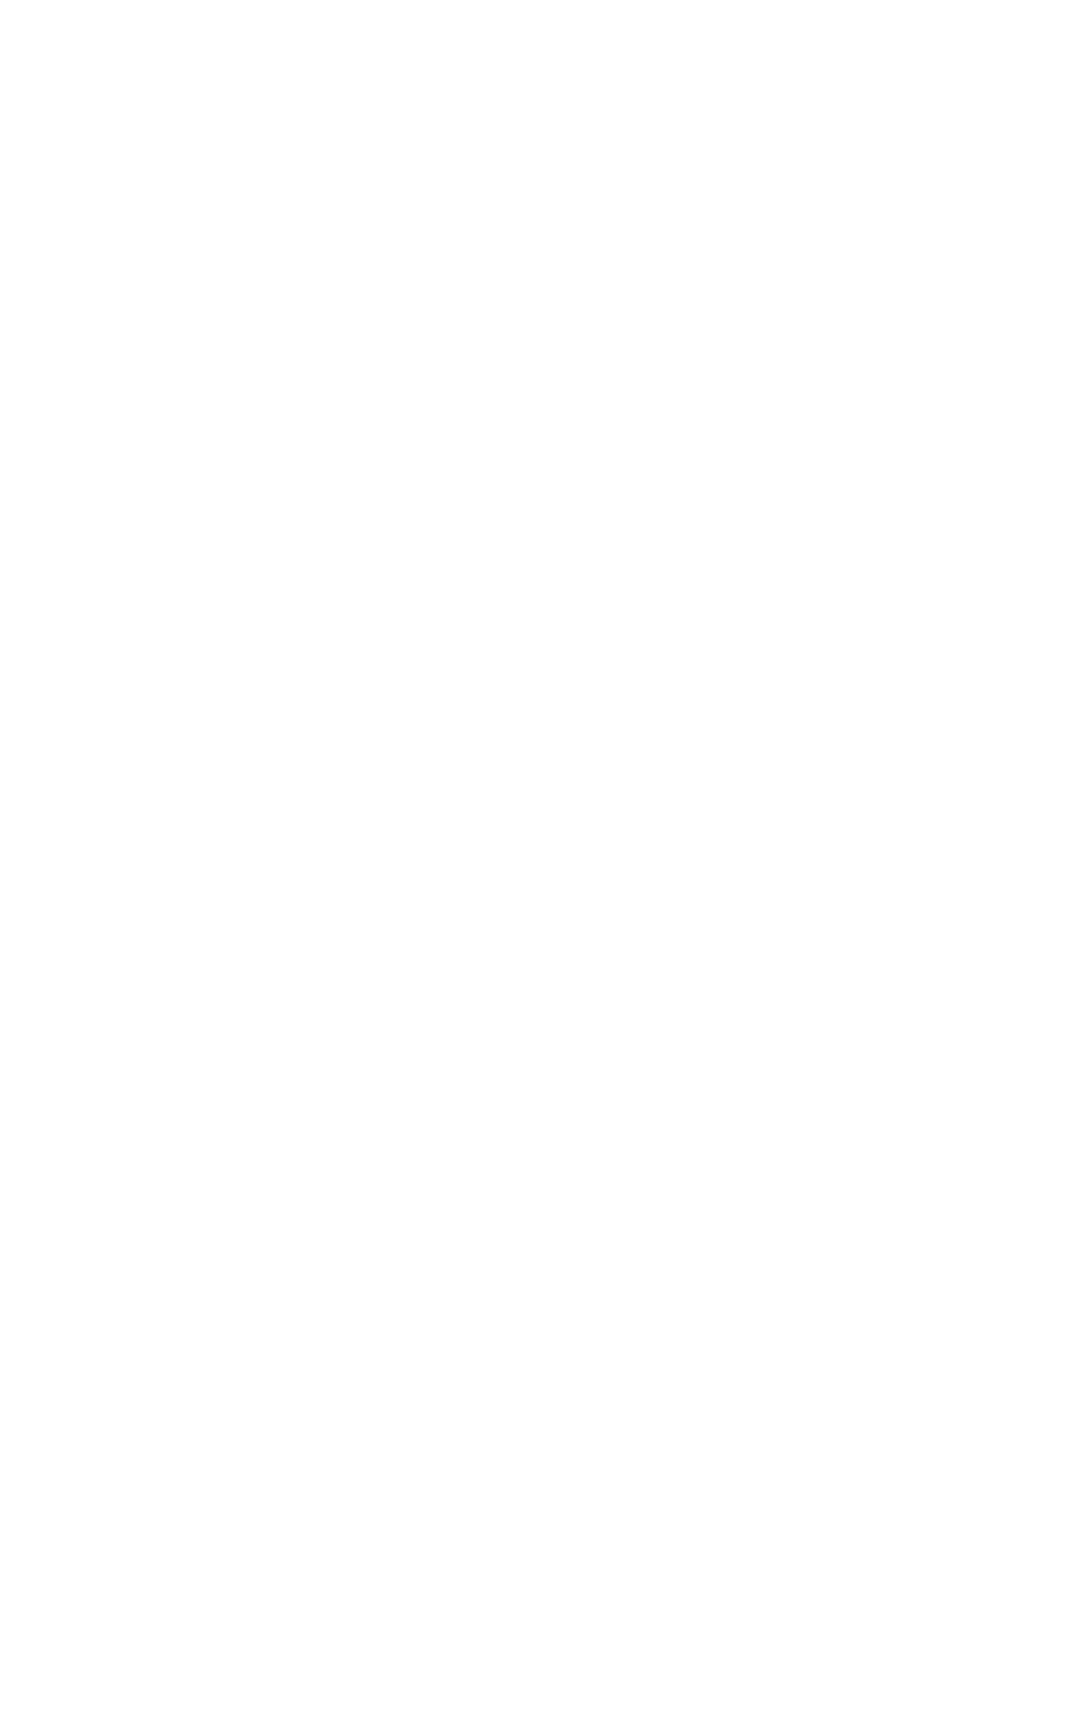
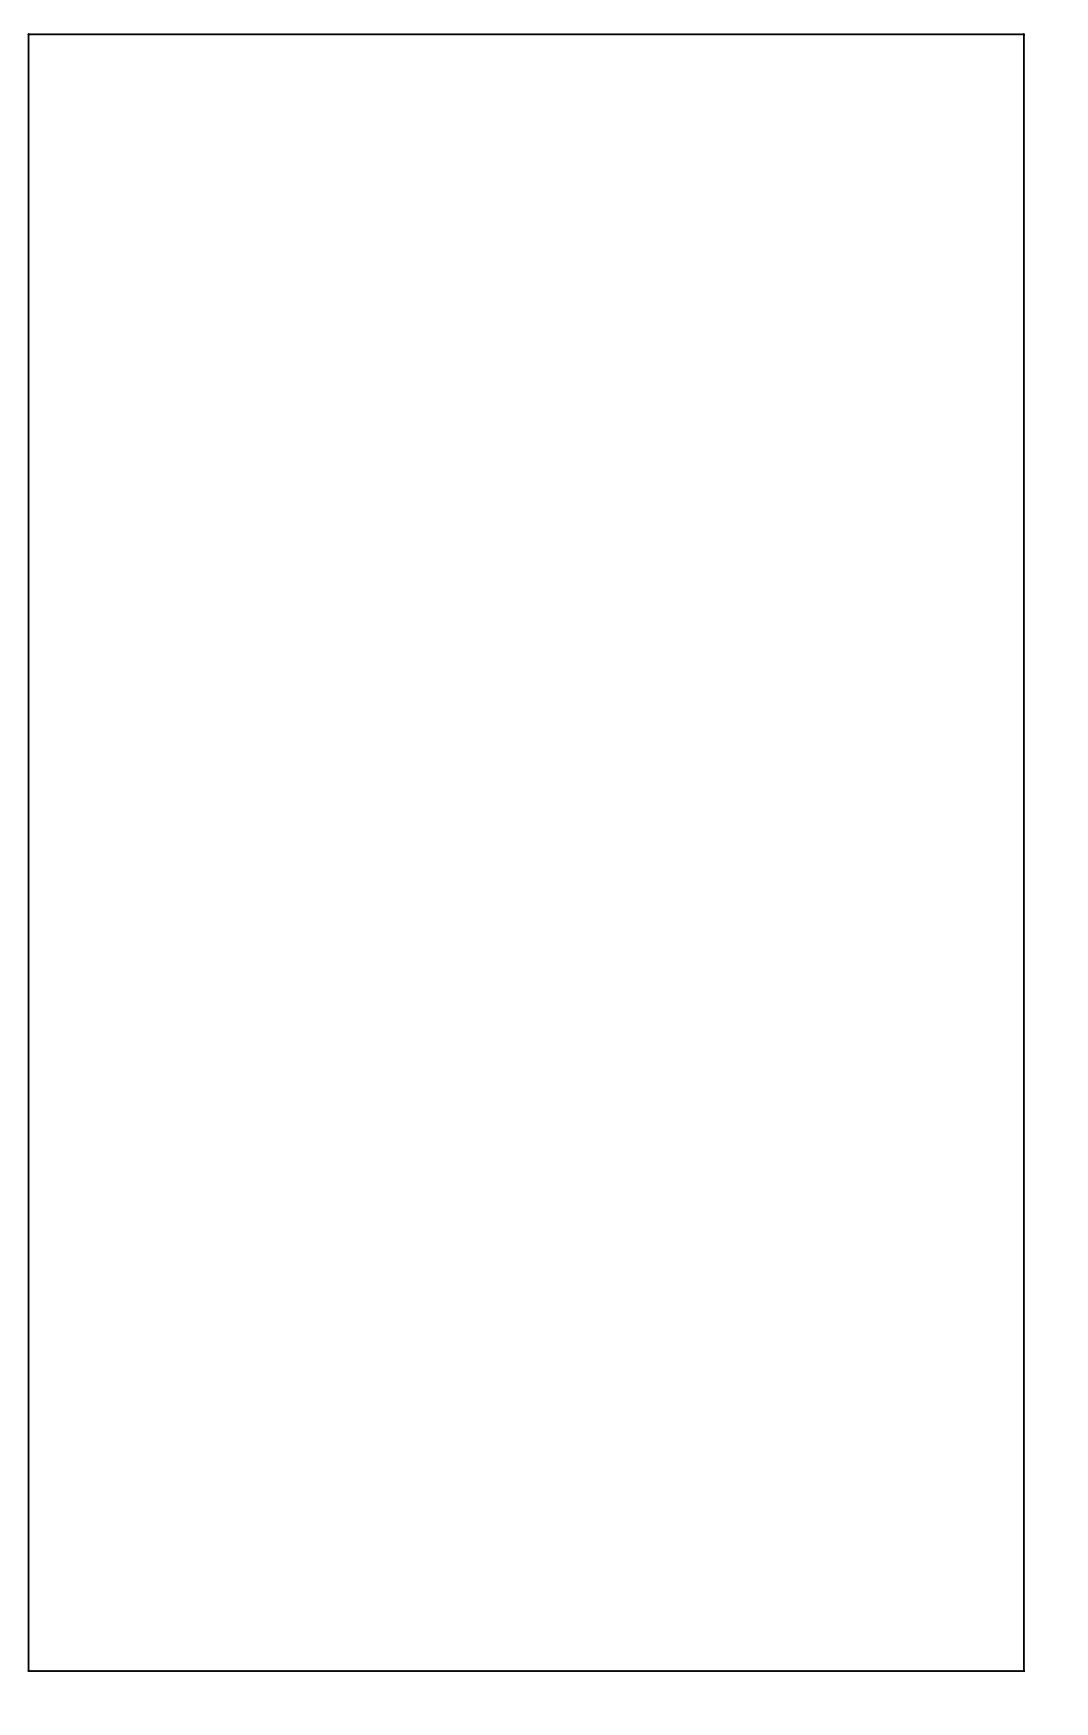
board edge: none -> (1023, 34) (28, 34) (28, 1671) (1023, 1671) (1023, 34)

